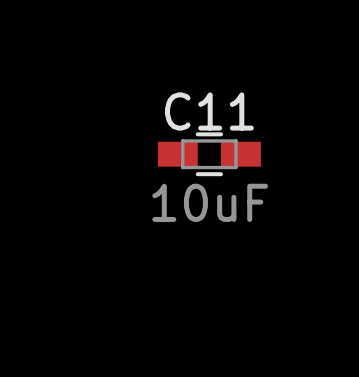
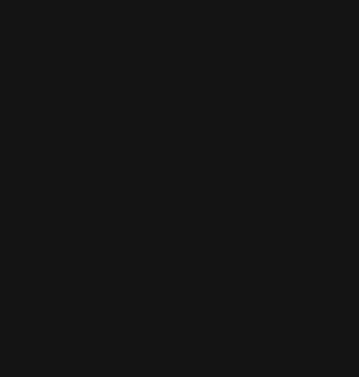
C11: 10uF (209, 154) -> none

